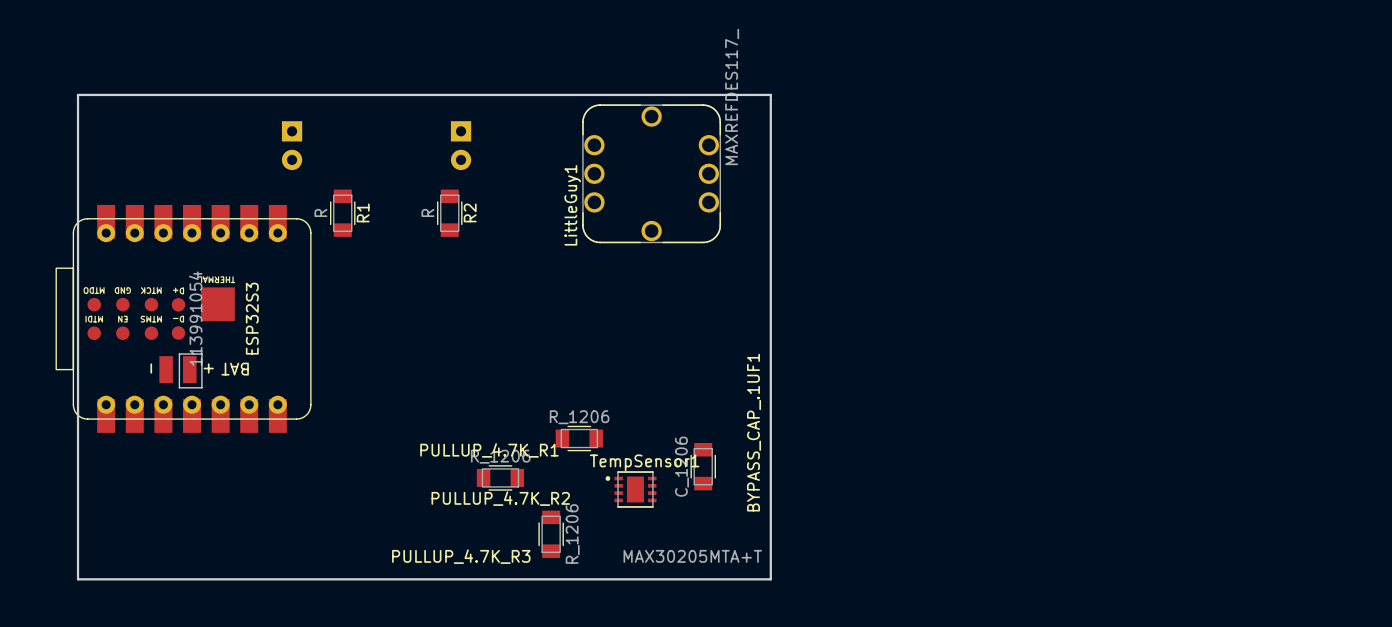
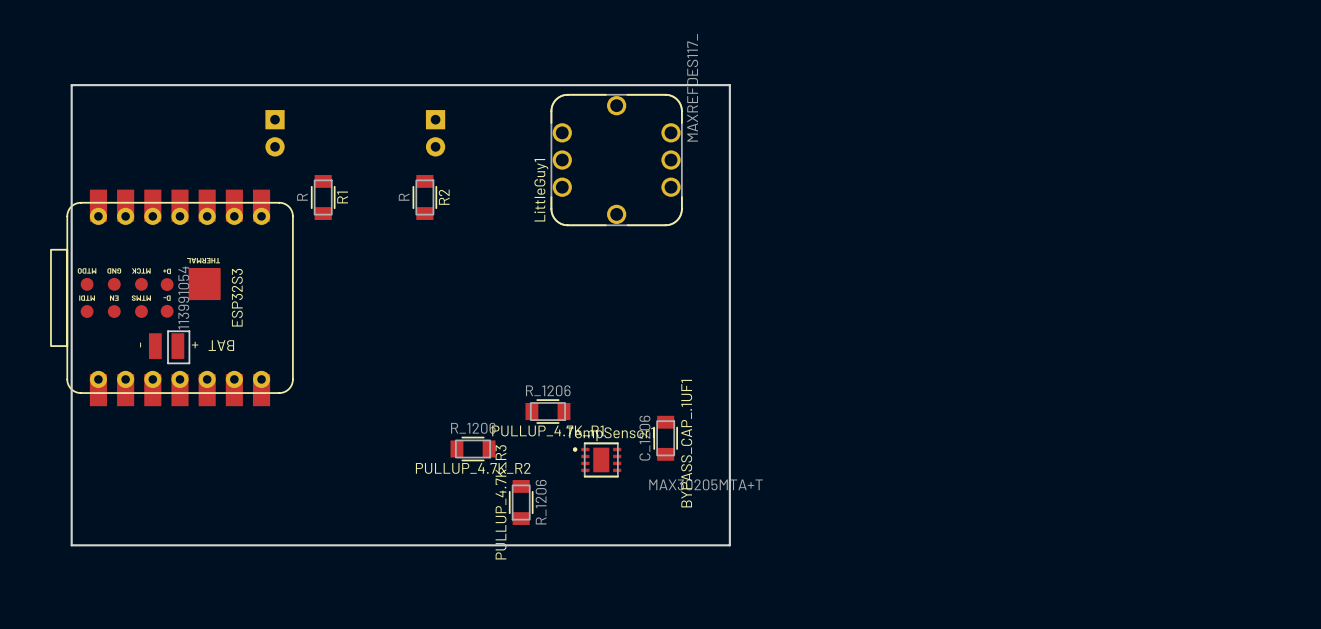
BYPASS_CAP_.1UF1 name position: BYPASS_CAP_.1UF1 (754, 432) -> BYPASS_CAP_.1UF1 (686, 443)
PULLUP_4.7K_R1 name position: PULLUP_4.7K_R1 (489, 450) -> PULLUP_4.7K_R1 (547, 430)
PULLUP_4.7K_R3 name rotation: 0° (461, 556) -> 90° counterclockwise (501, 502)
TempSensor1 value position: MAX30205MTA+T (692, 556) -> MAX30205MTA+T (706, 484)

